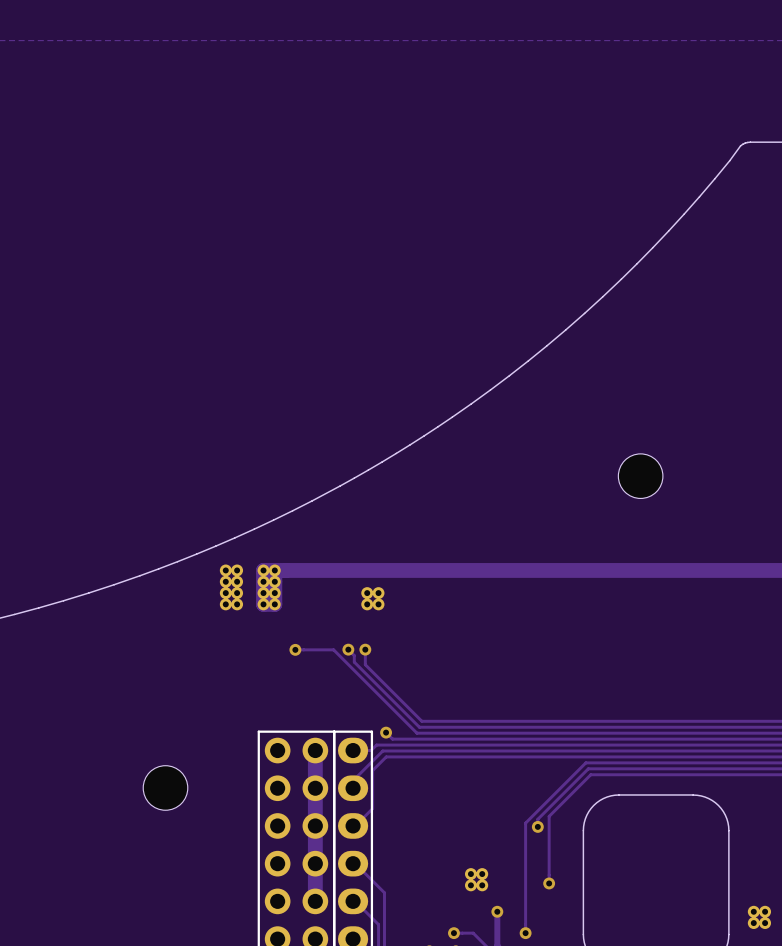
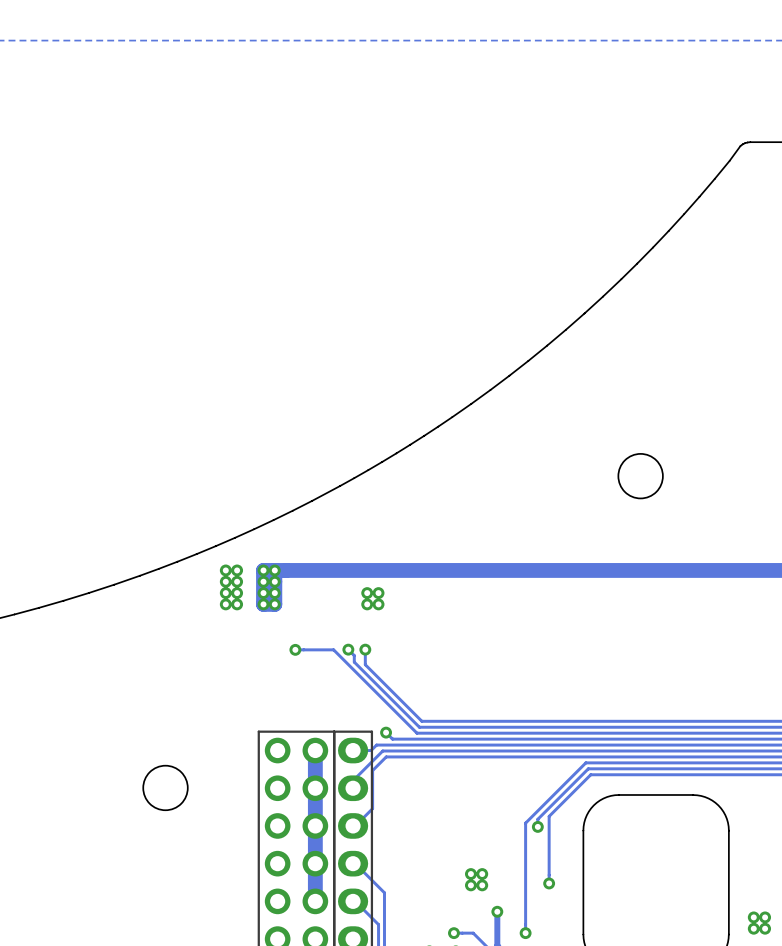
part: (753, 911) -> none
part: (765, 911) -> none
part: none -> (753, 917)
part: none -> (765, 917)
part: (753, 923) -> none
part: (765, 923) -> none
part: none -> (753, 928)
part: none -> (765, 928)

